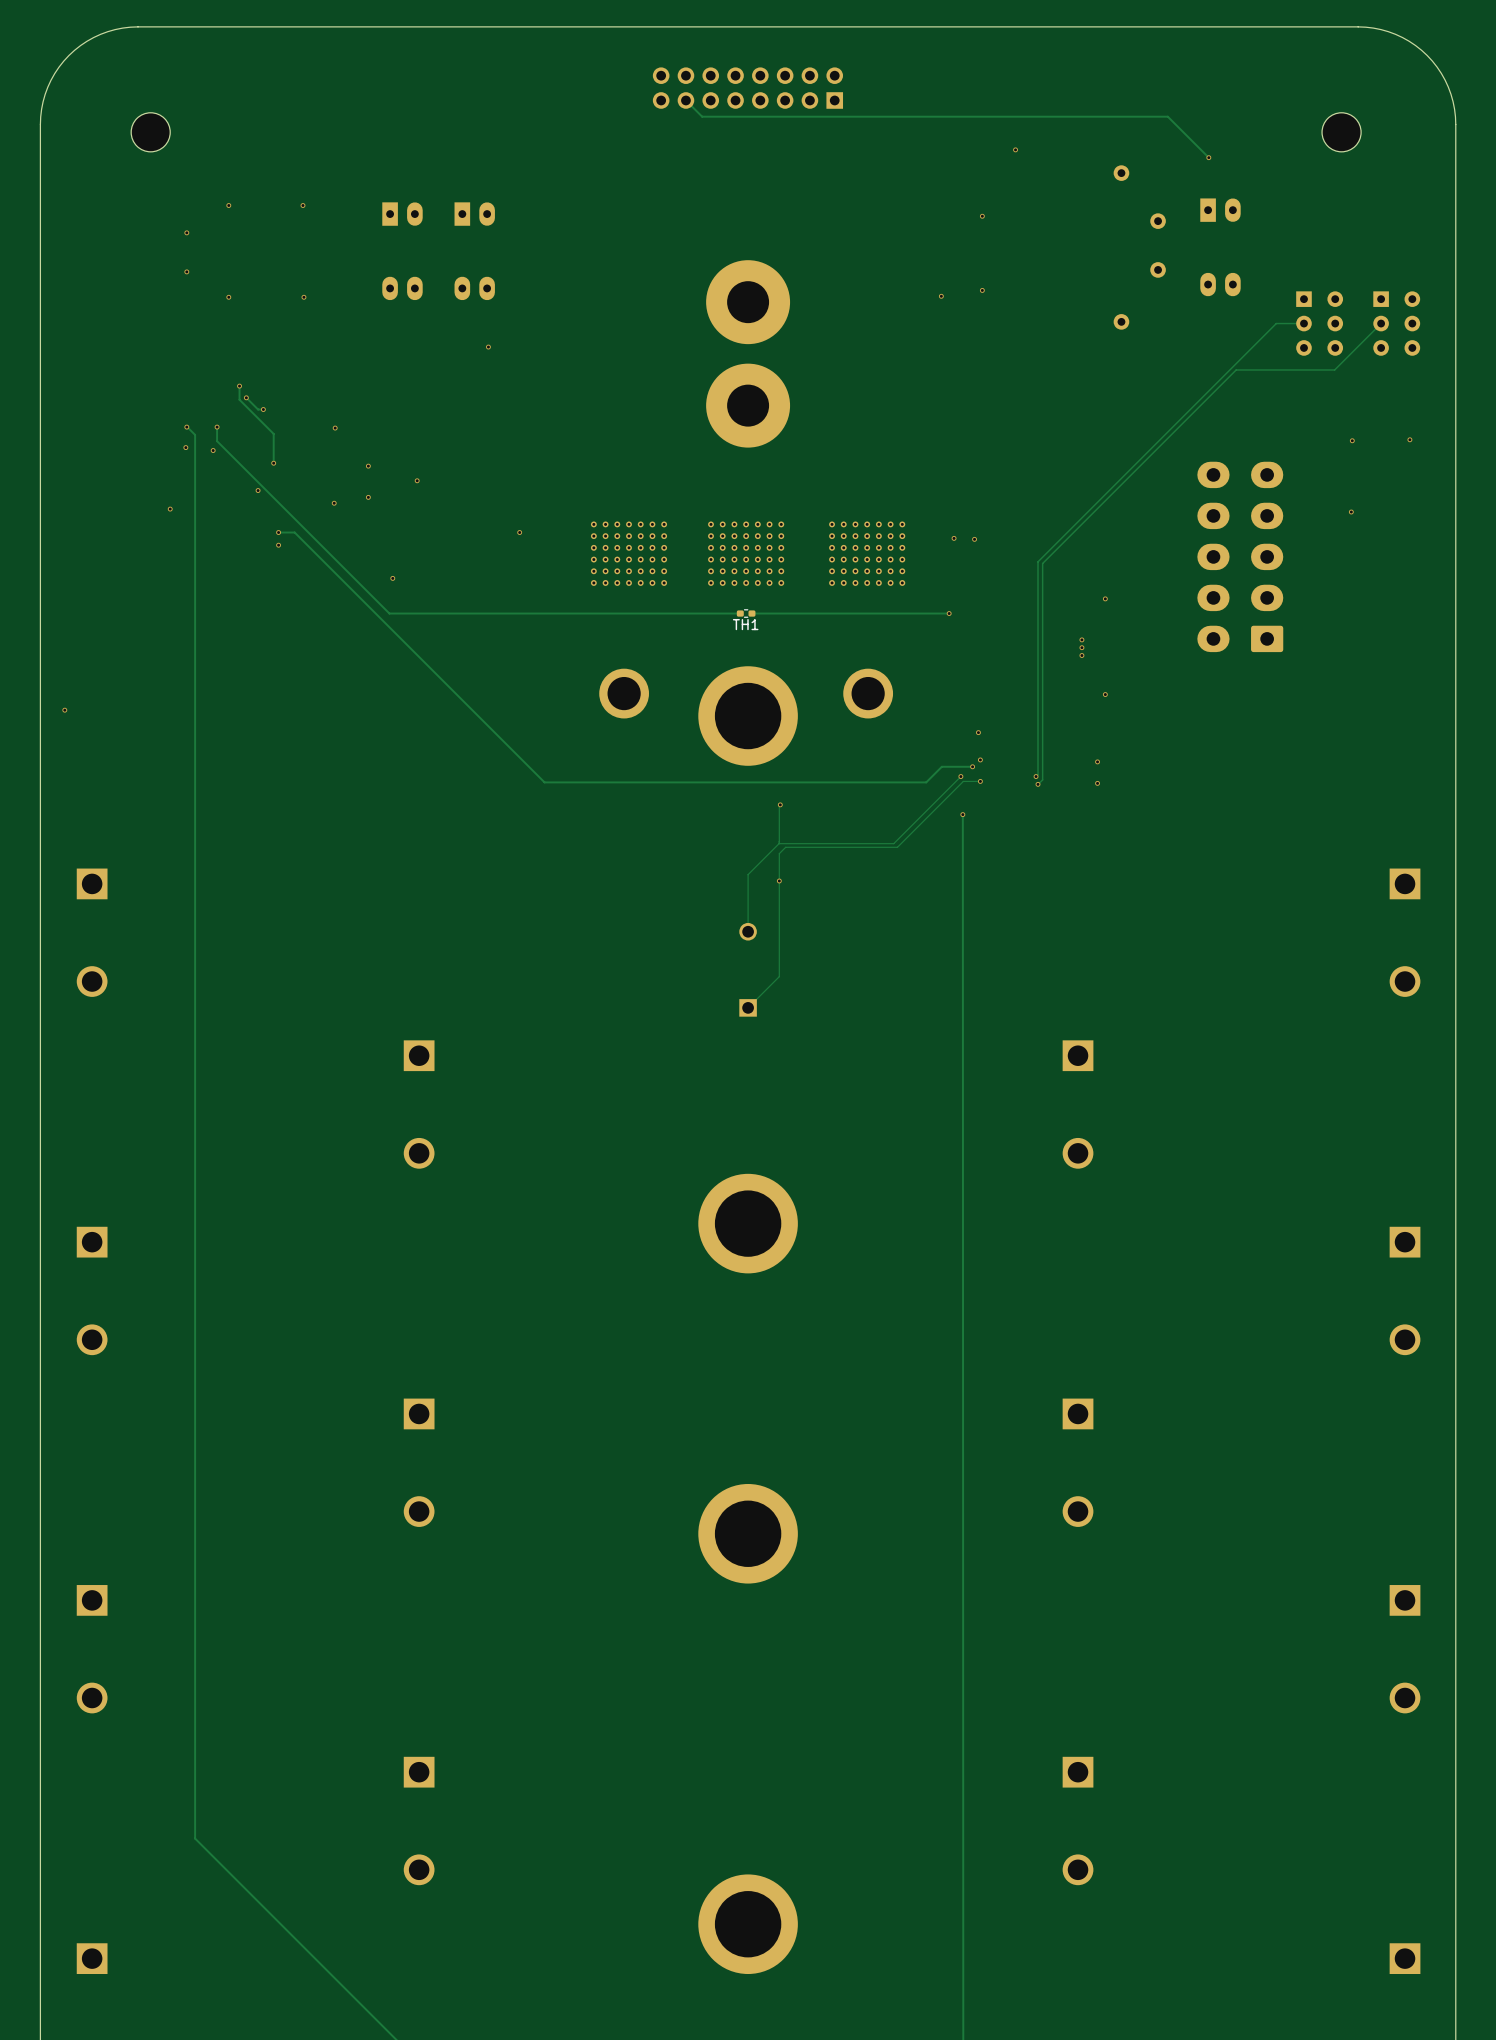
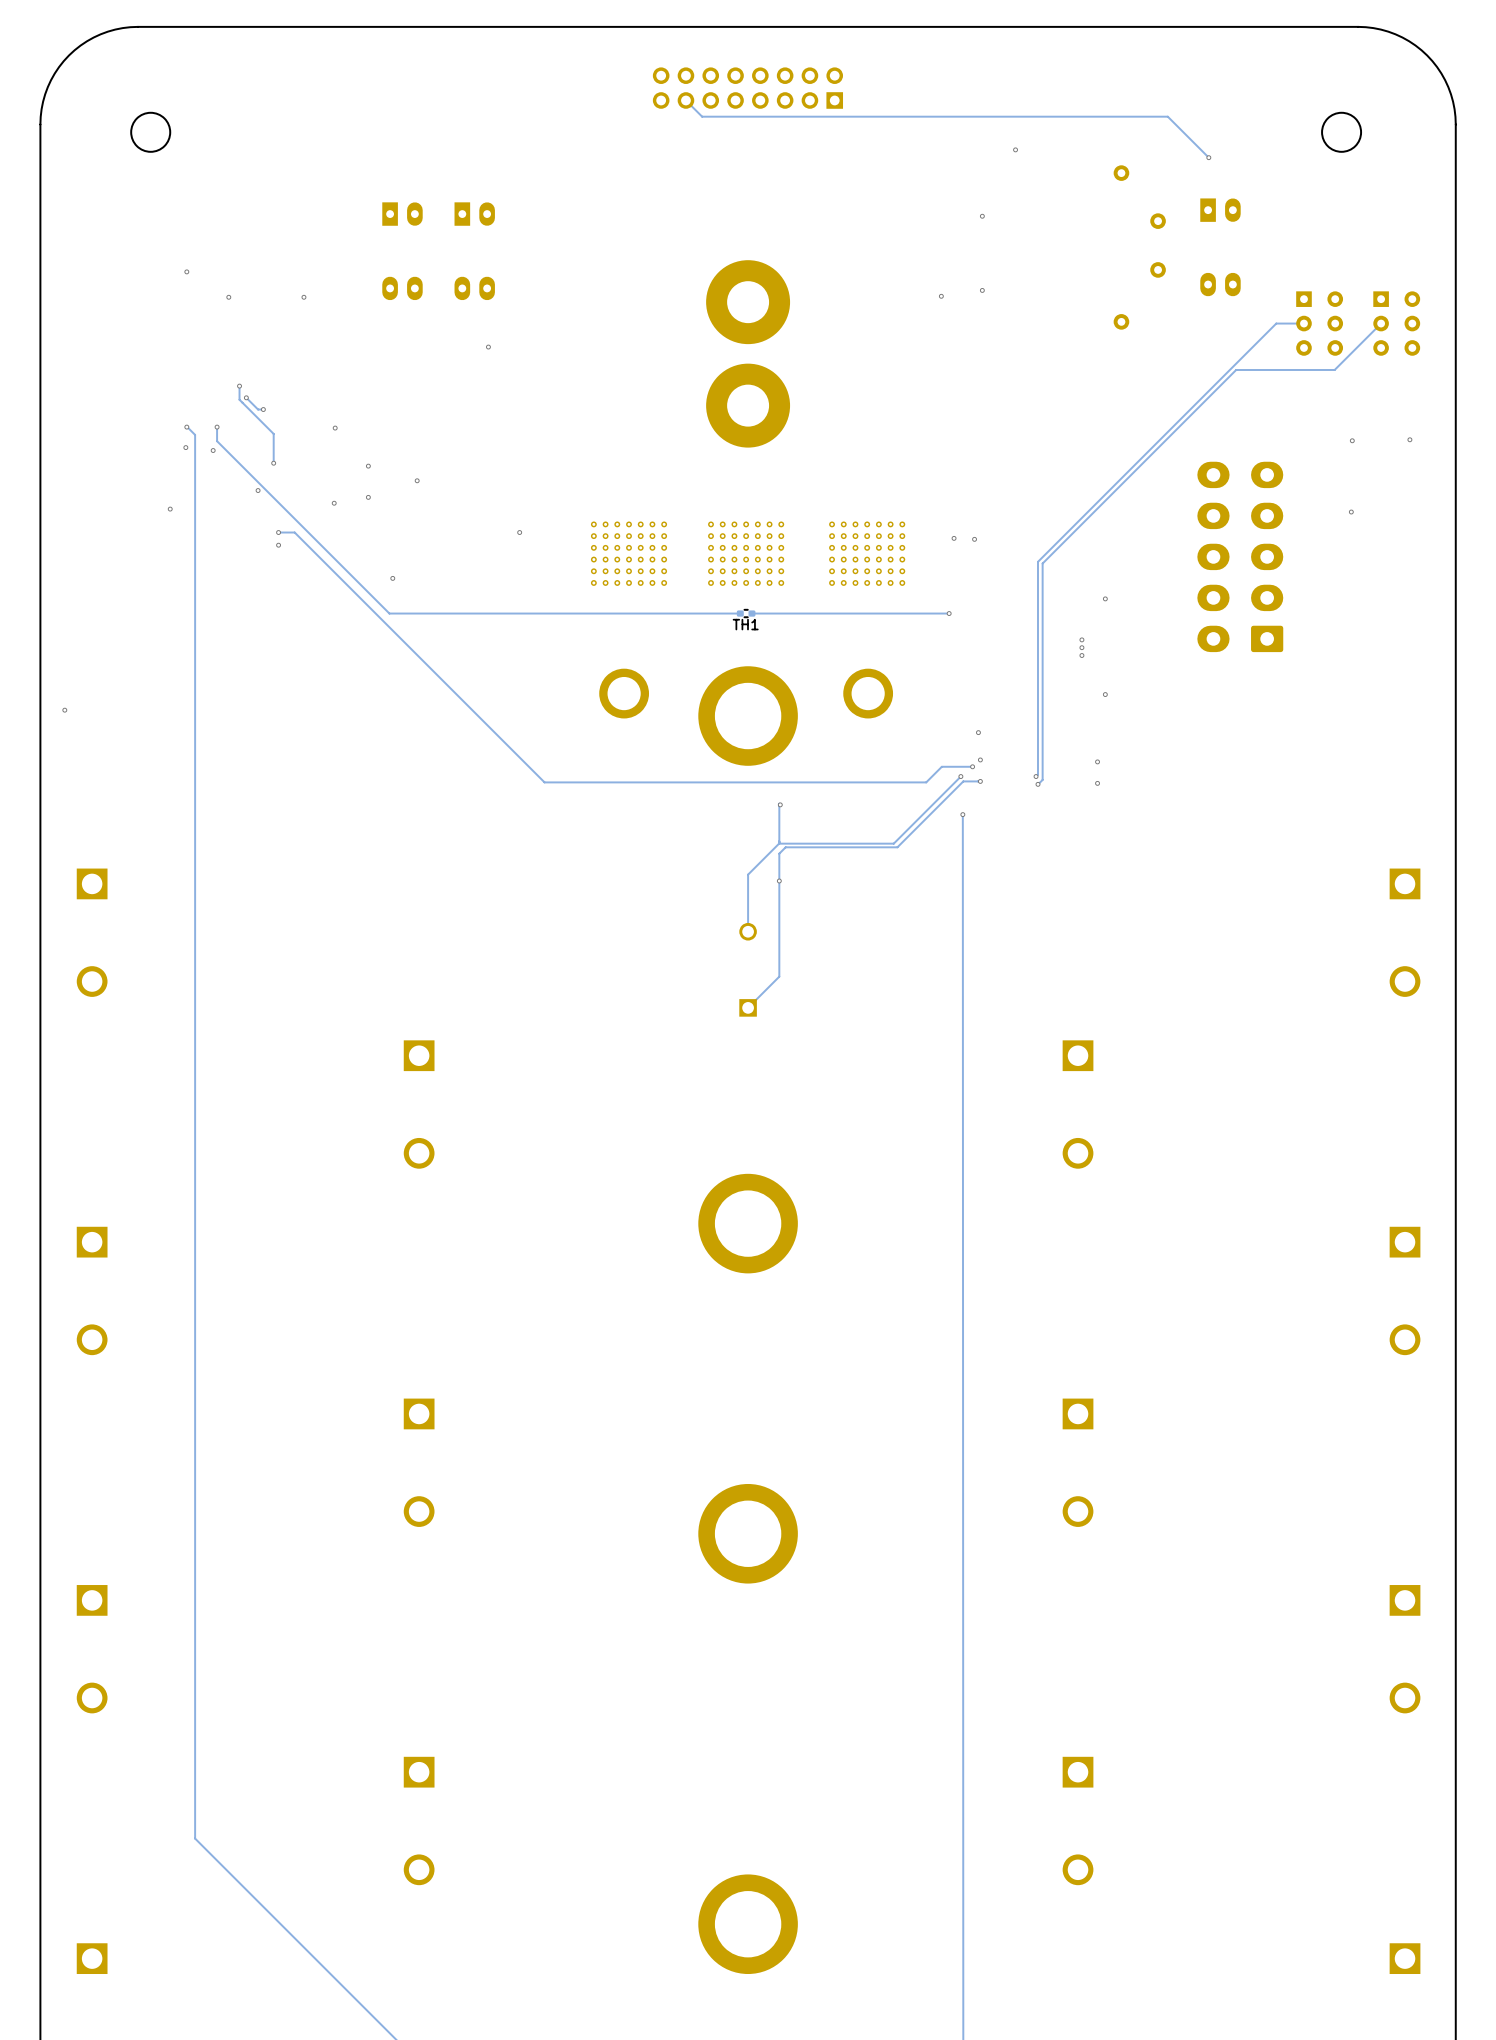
via: (228, 205) -> none
via: (302, 205) -> none
via: (186, 232) -> none

